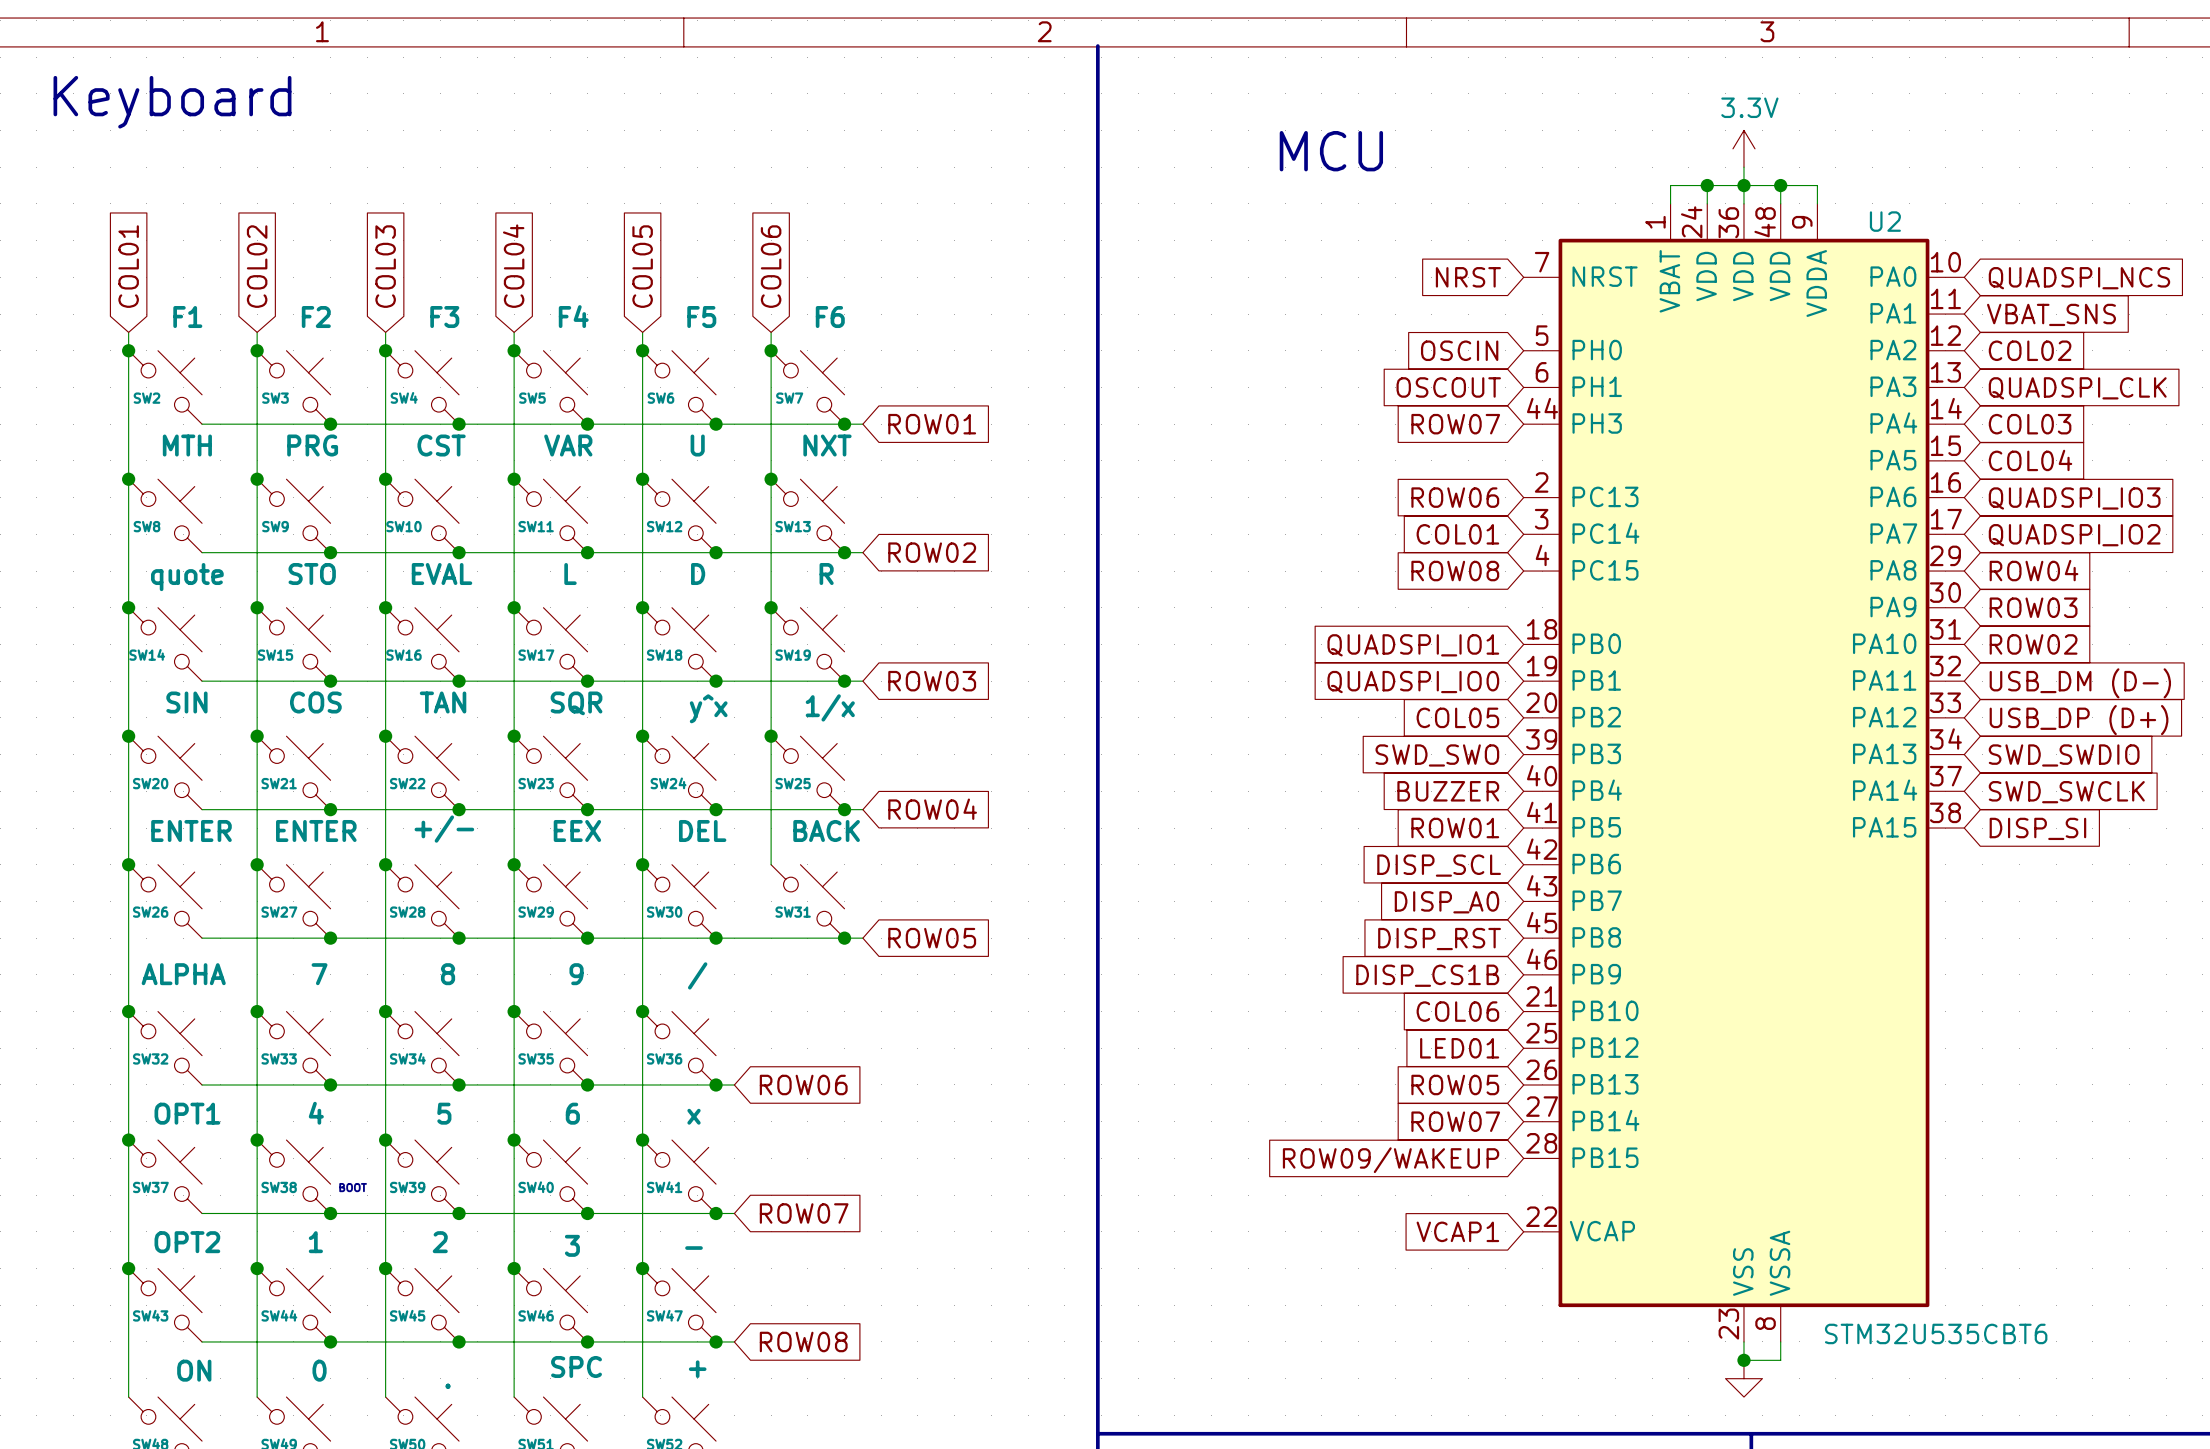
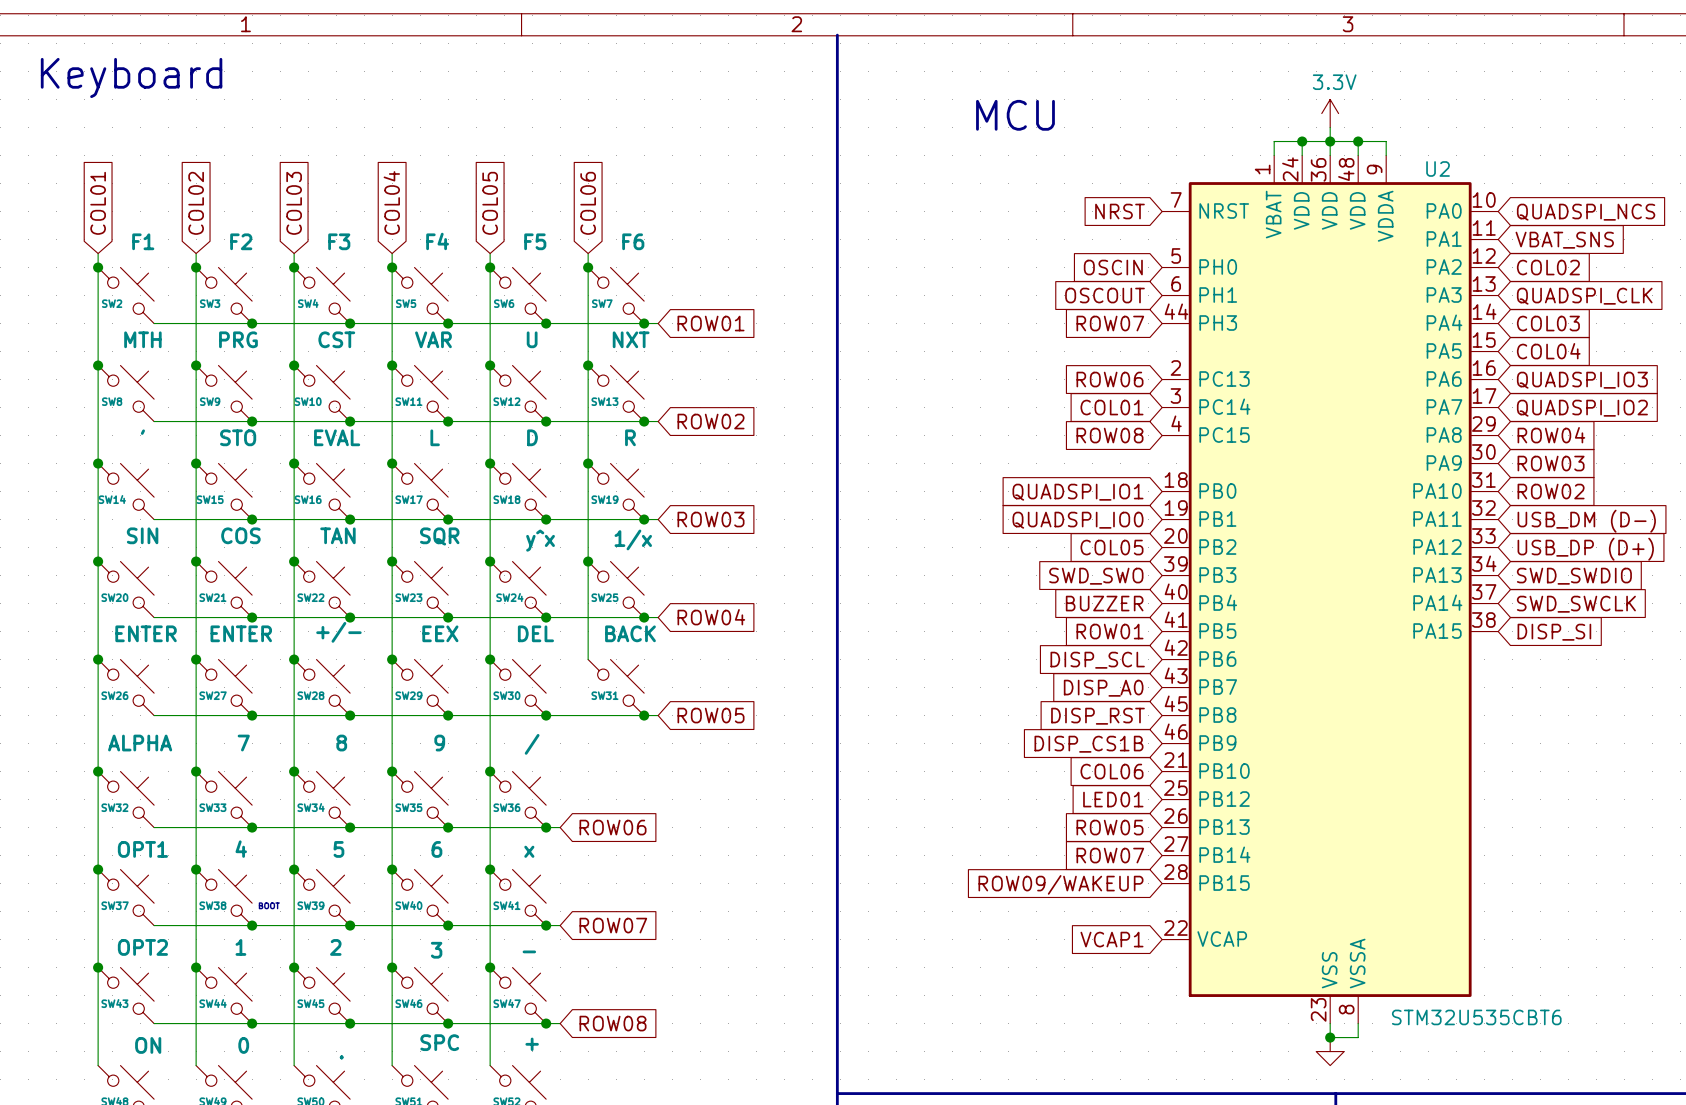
SW14 value: quote (187, 577) -> ' (142, 432)

